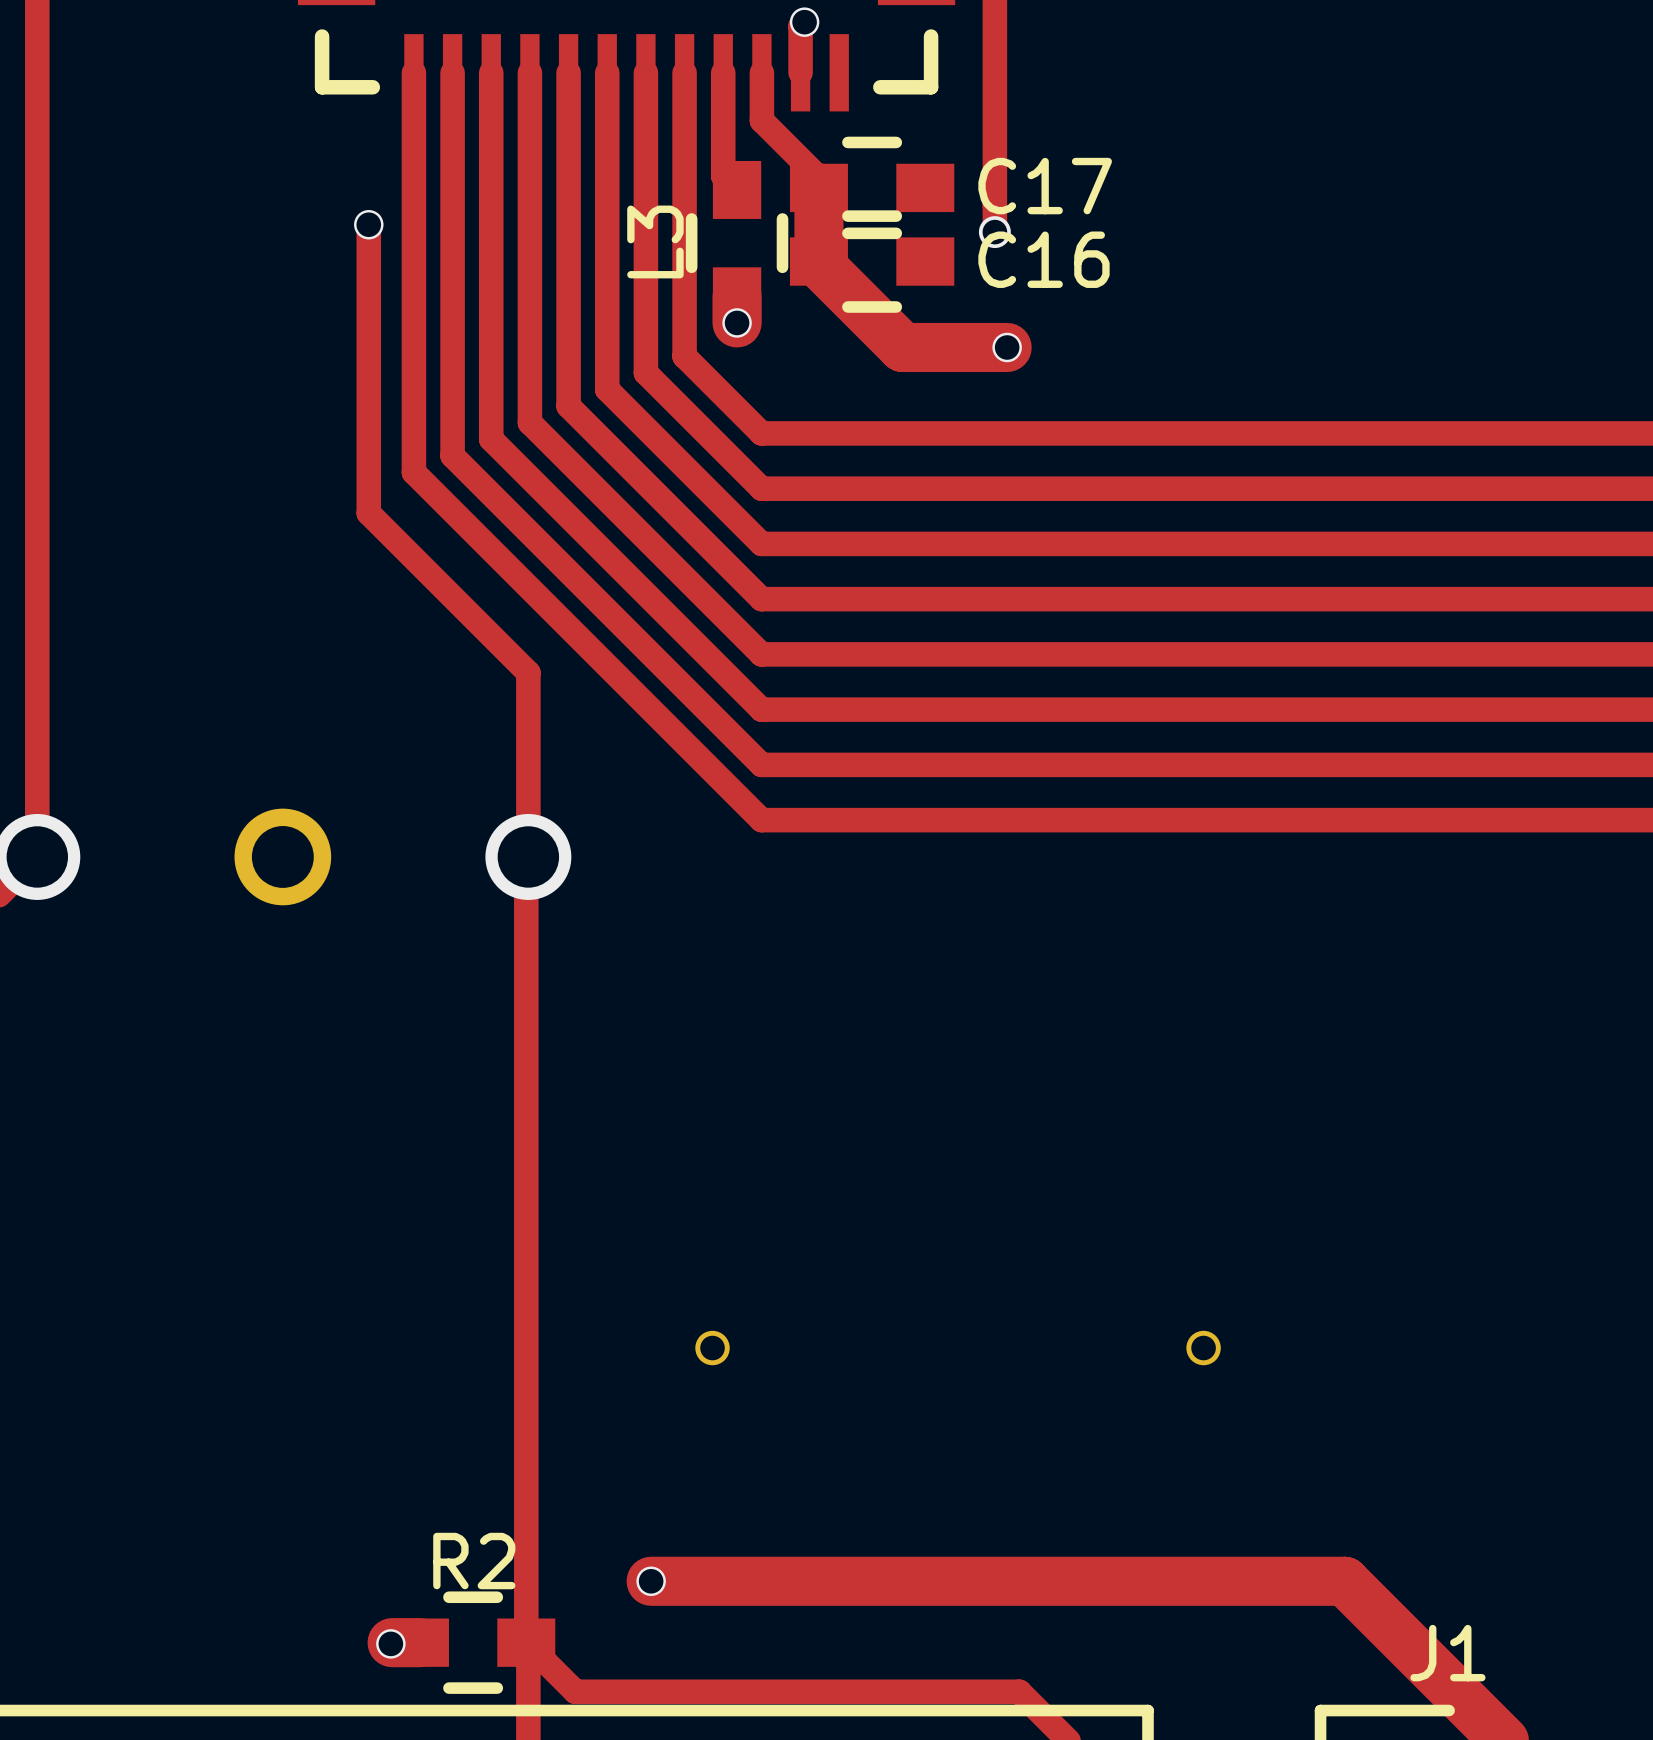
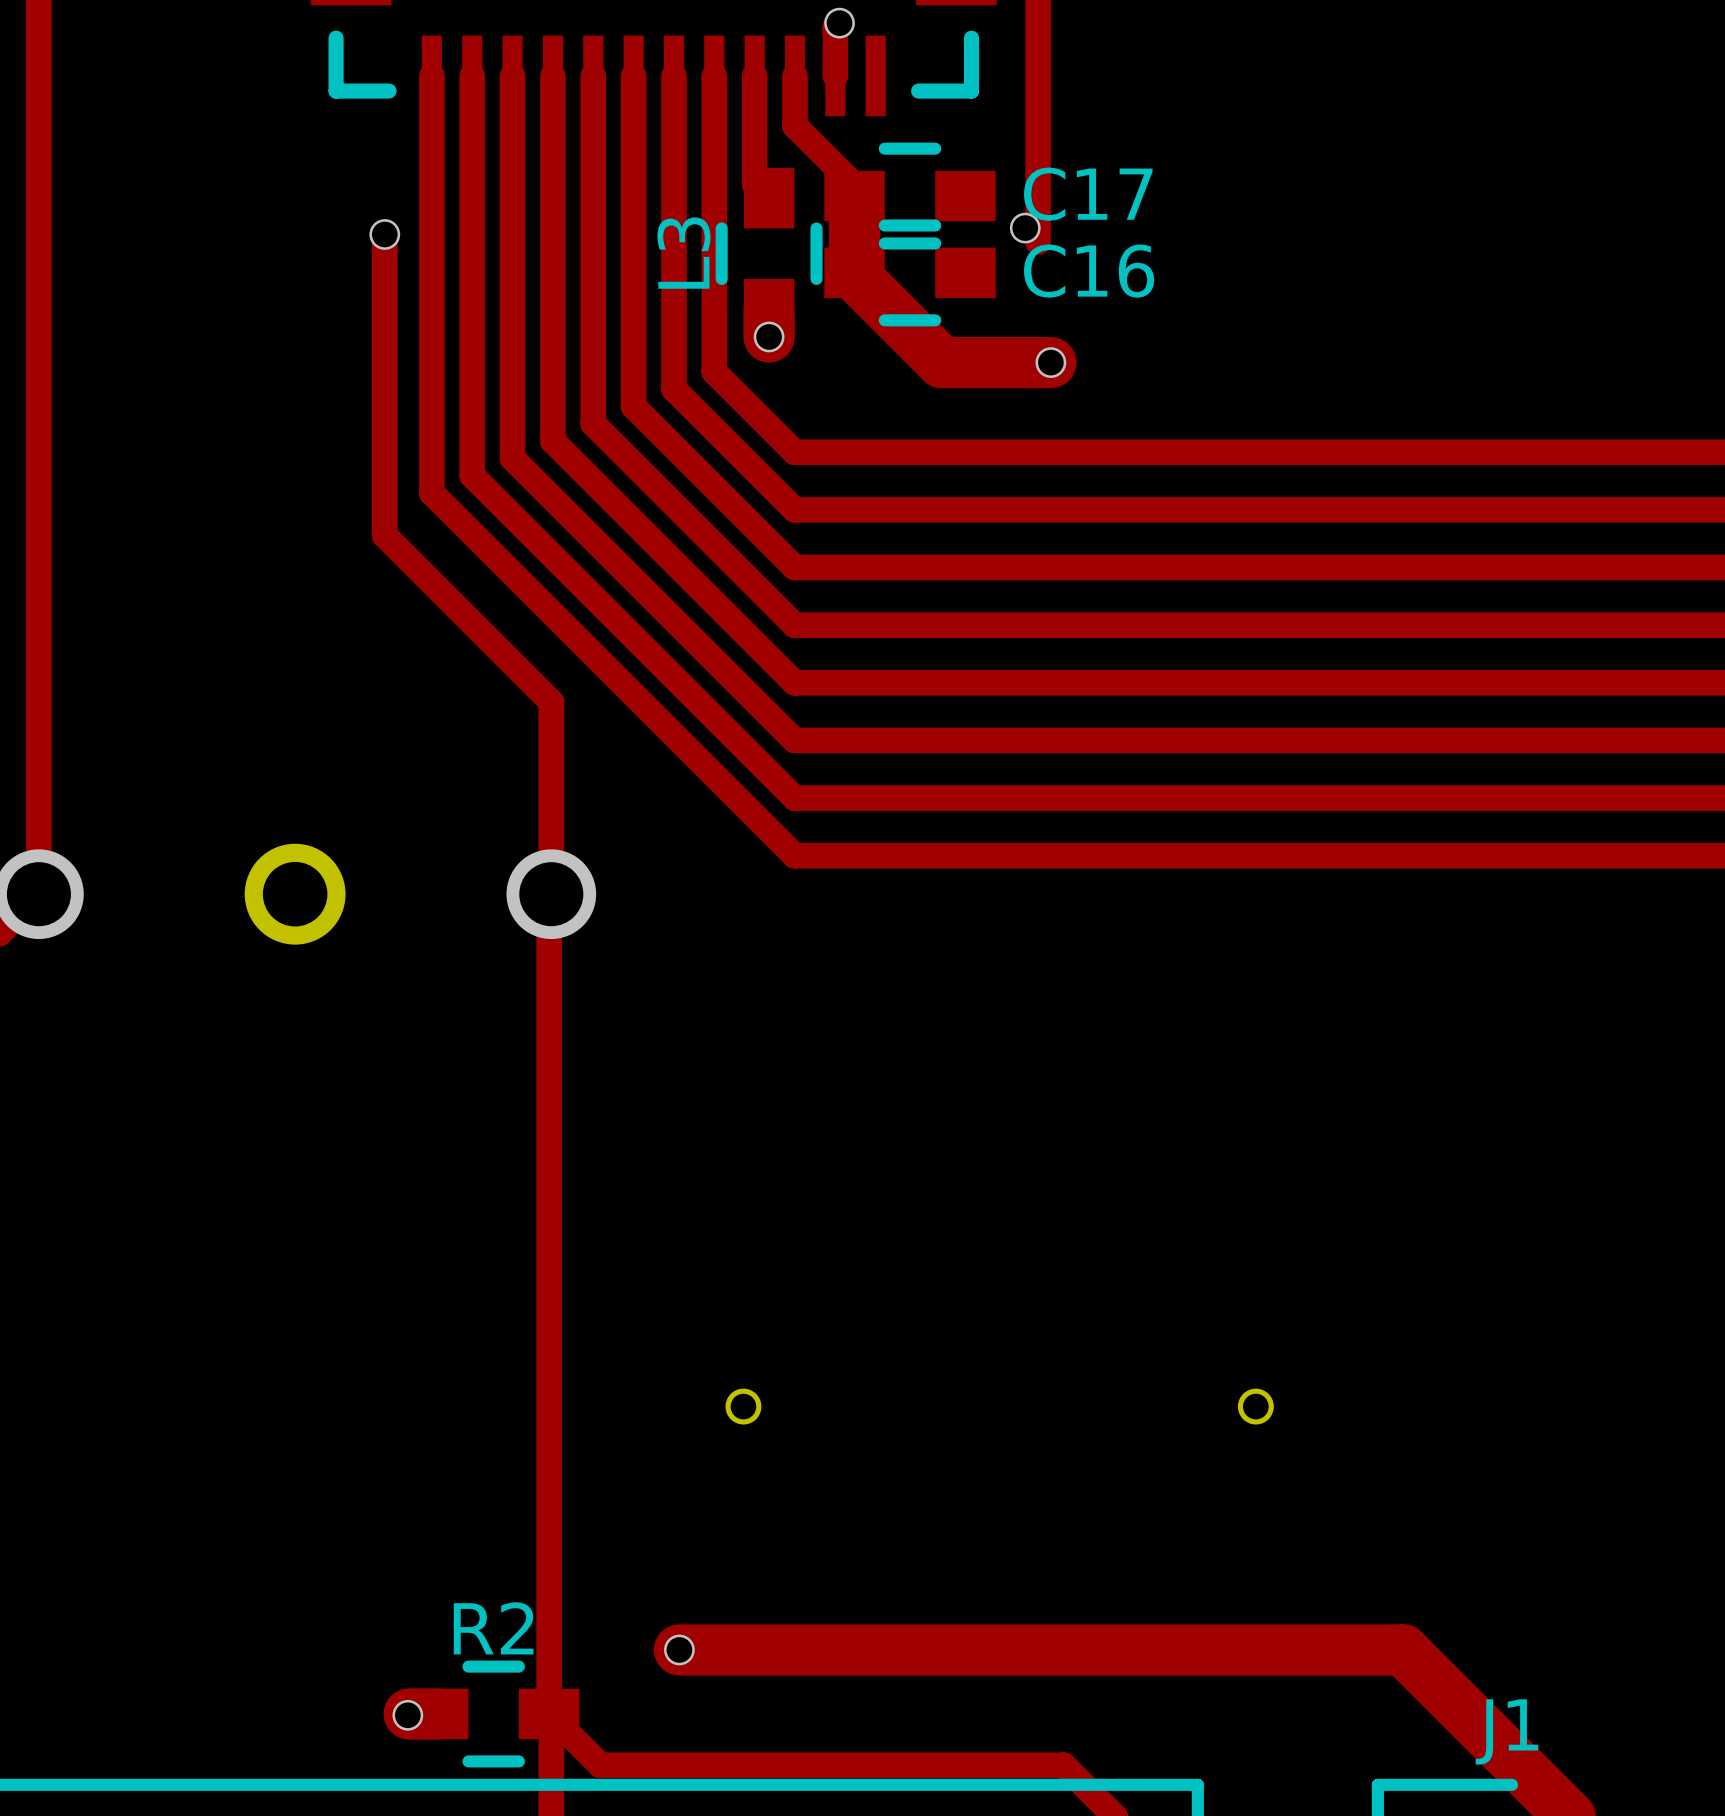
via position: (994, 232) -> (1025, 228)

